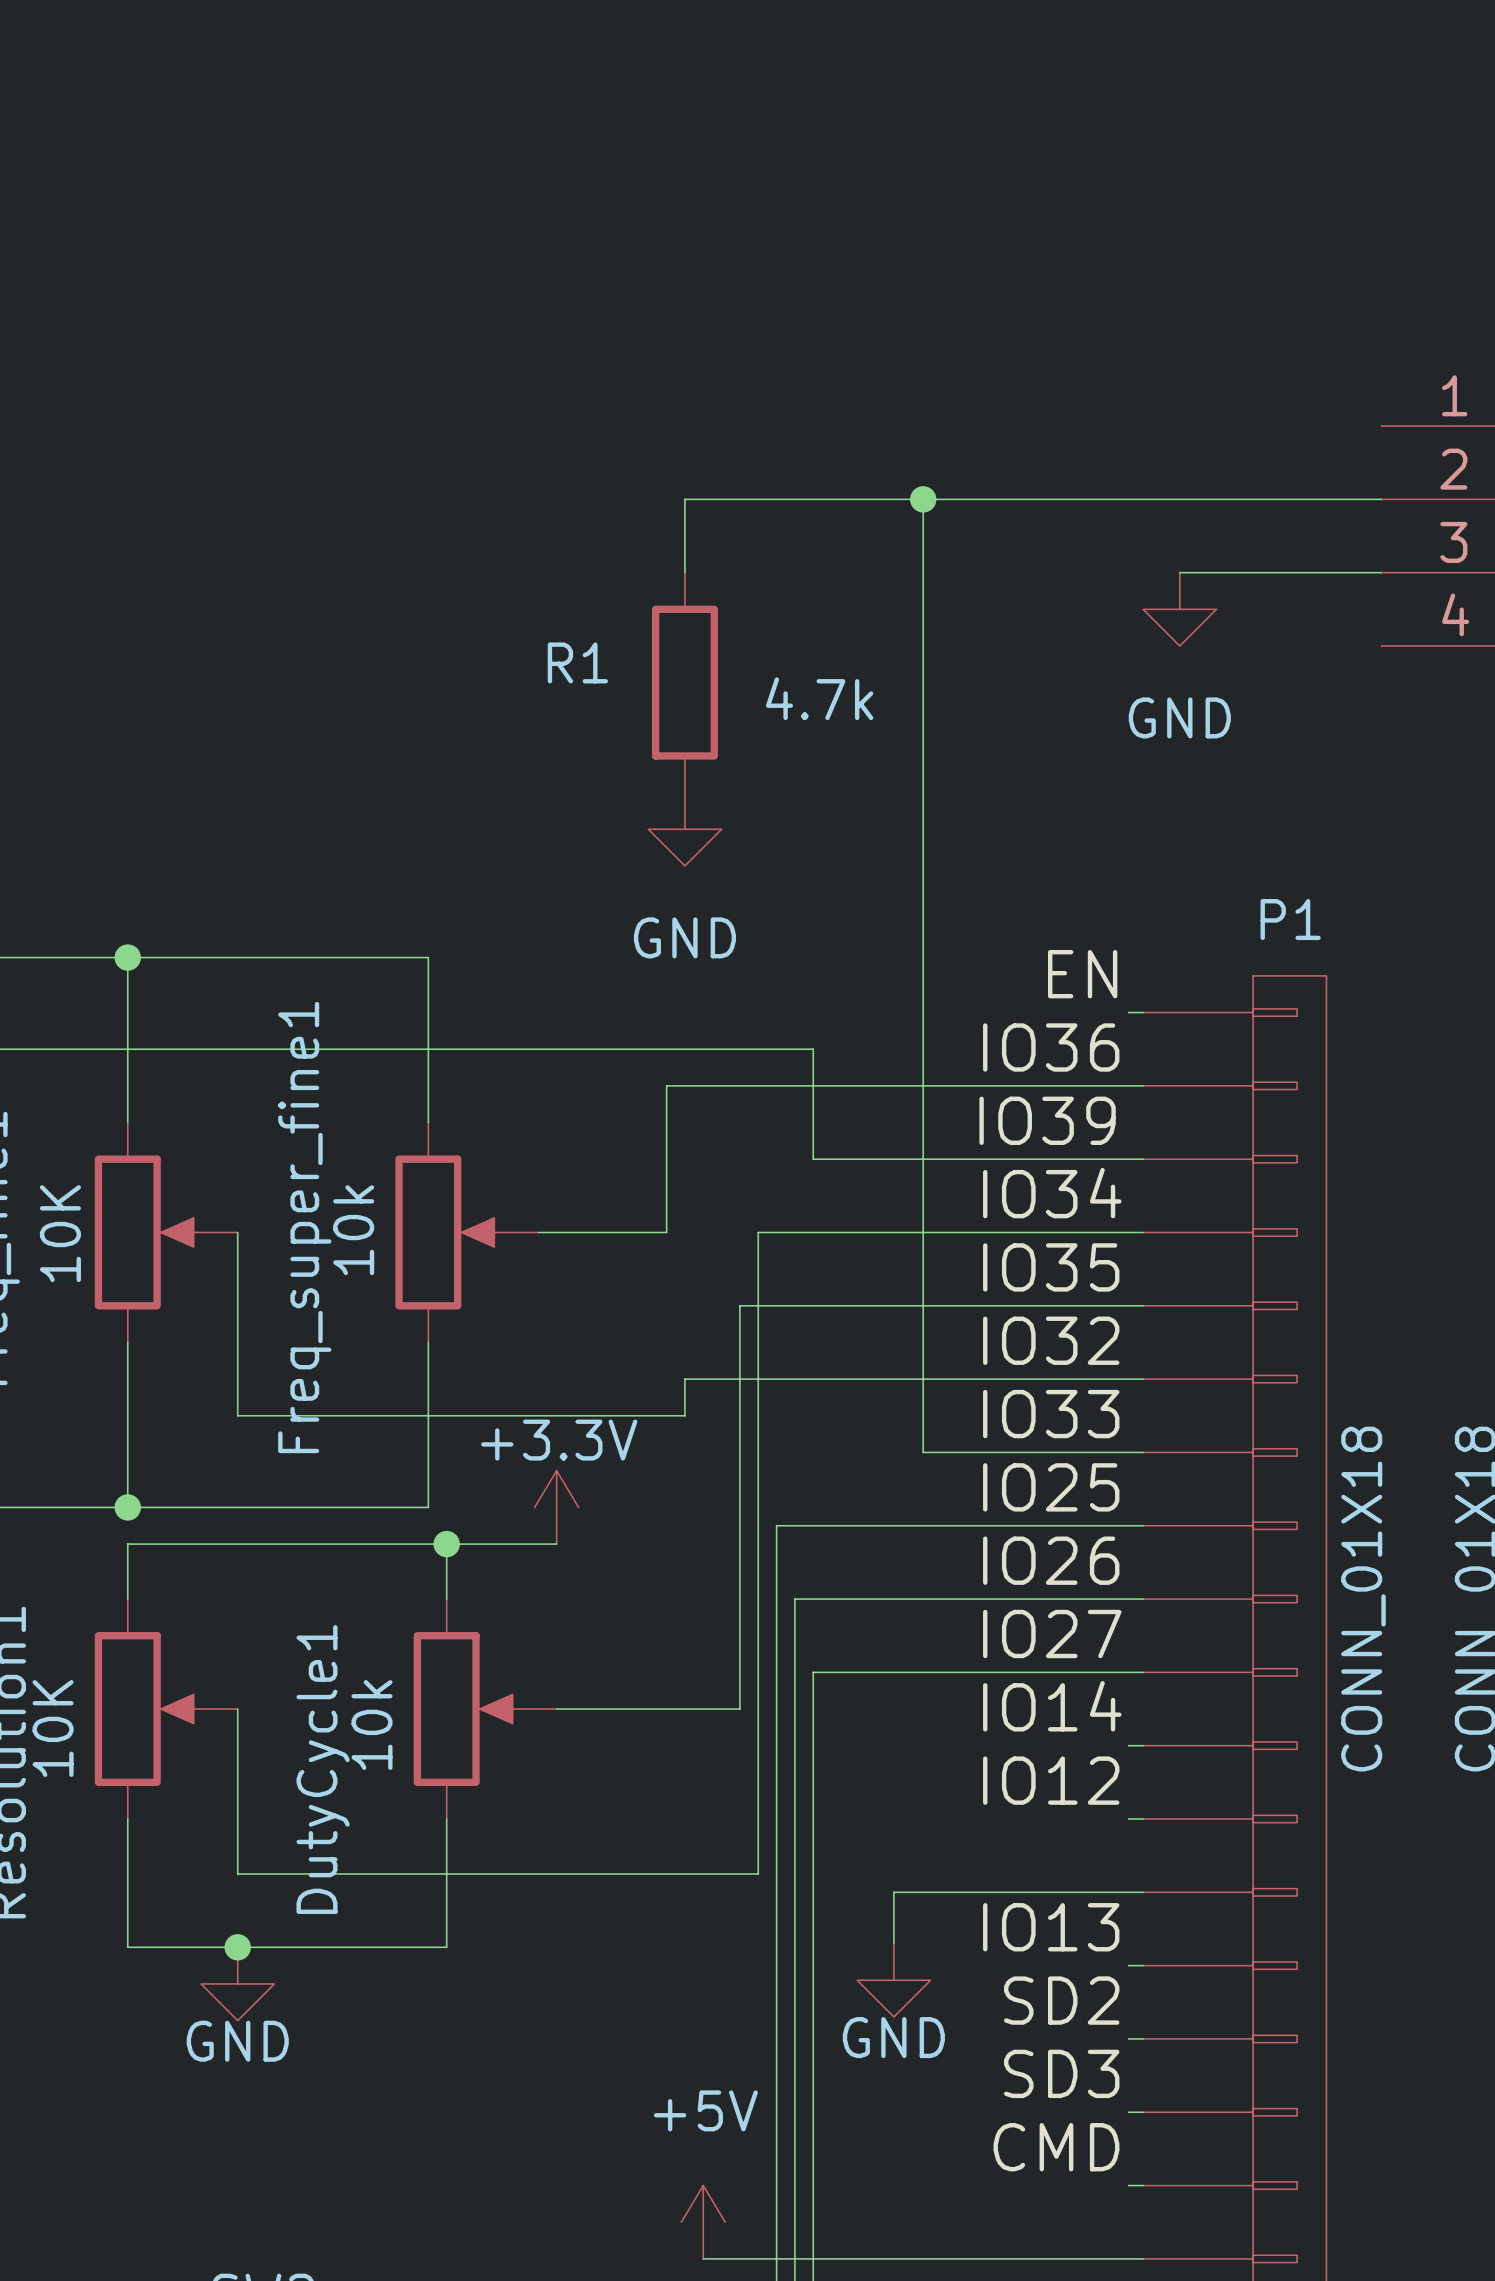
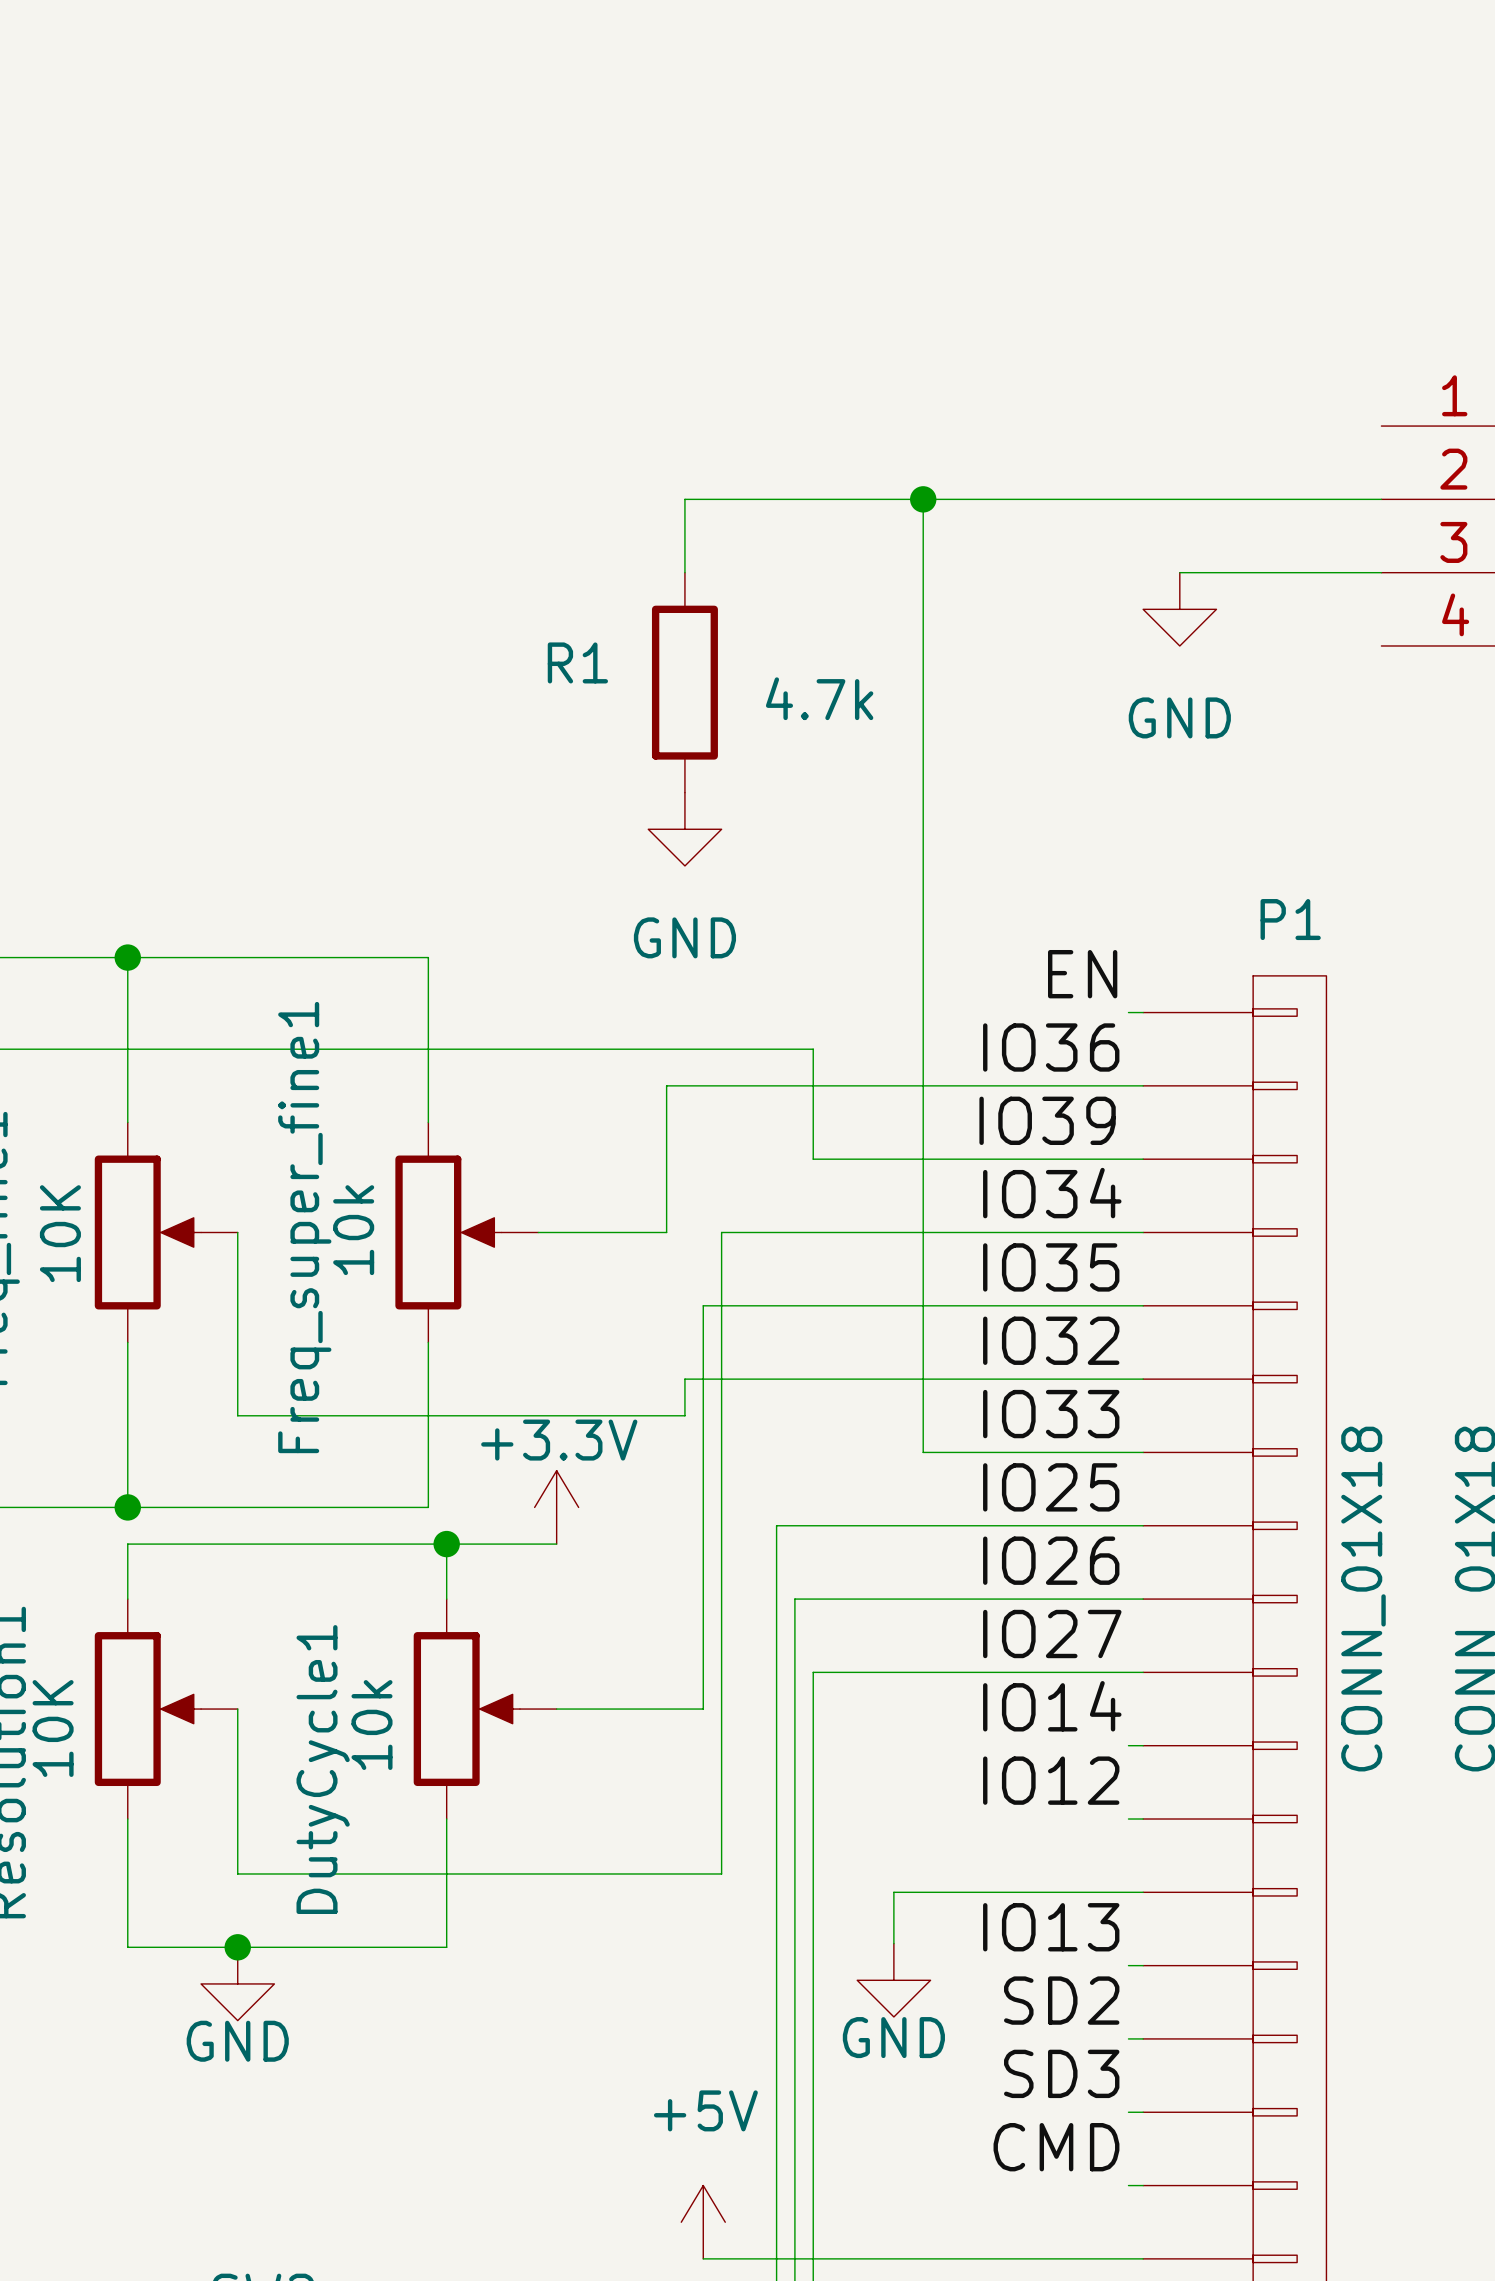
wire: (758, 1232) (758, 1873) (721, 1873) -> (758, 1232) (721, 1232) (721, 1873)
wire: (739, 1305) (739, 1709) (703, 1709) -> (739, 1305) (703, 1305) (703, 1709)

